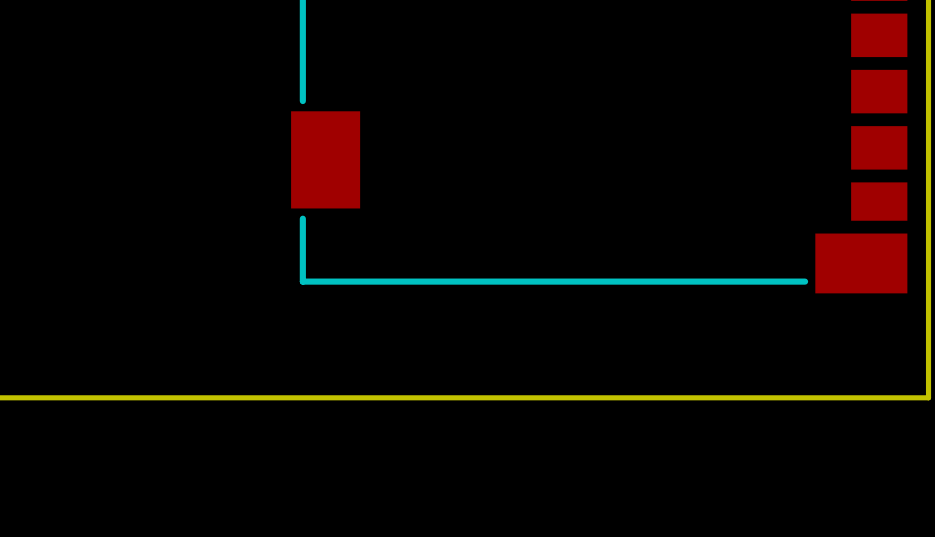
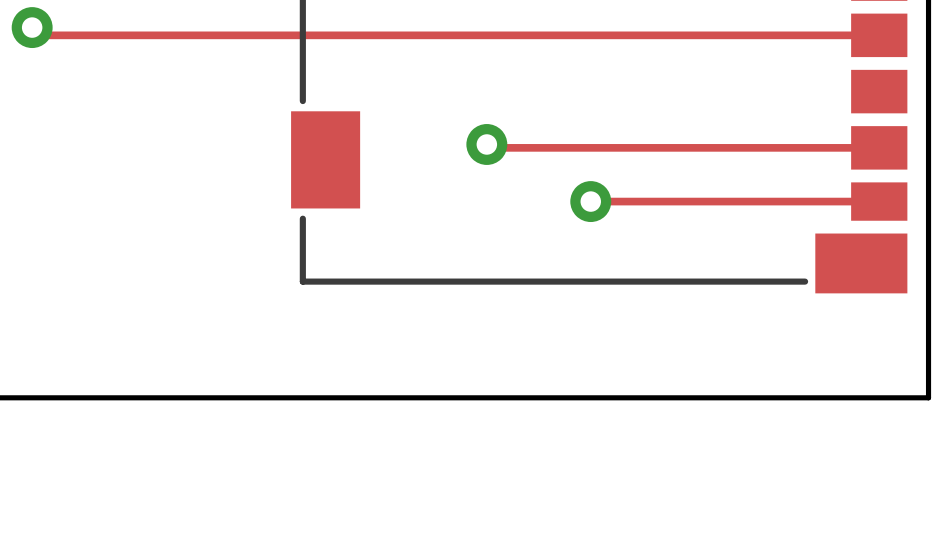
track: none -> (32, 27) (39, 35) (879, 35)
via: none -> (32, 27)
track: none -> (486, 144) (490, 147) (879, 147)
via: none -> (486, 144)
track: none -> (590, 201) (879, 201)
via: none -> (590, 201)

